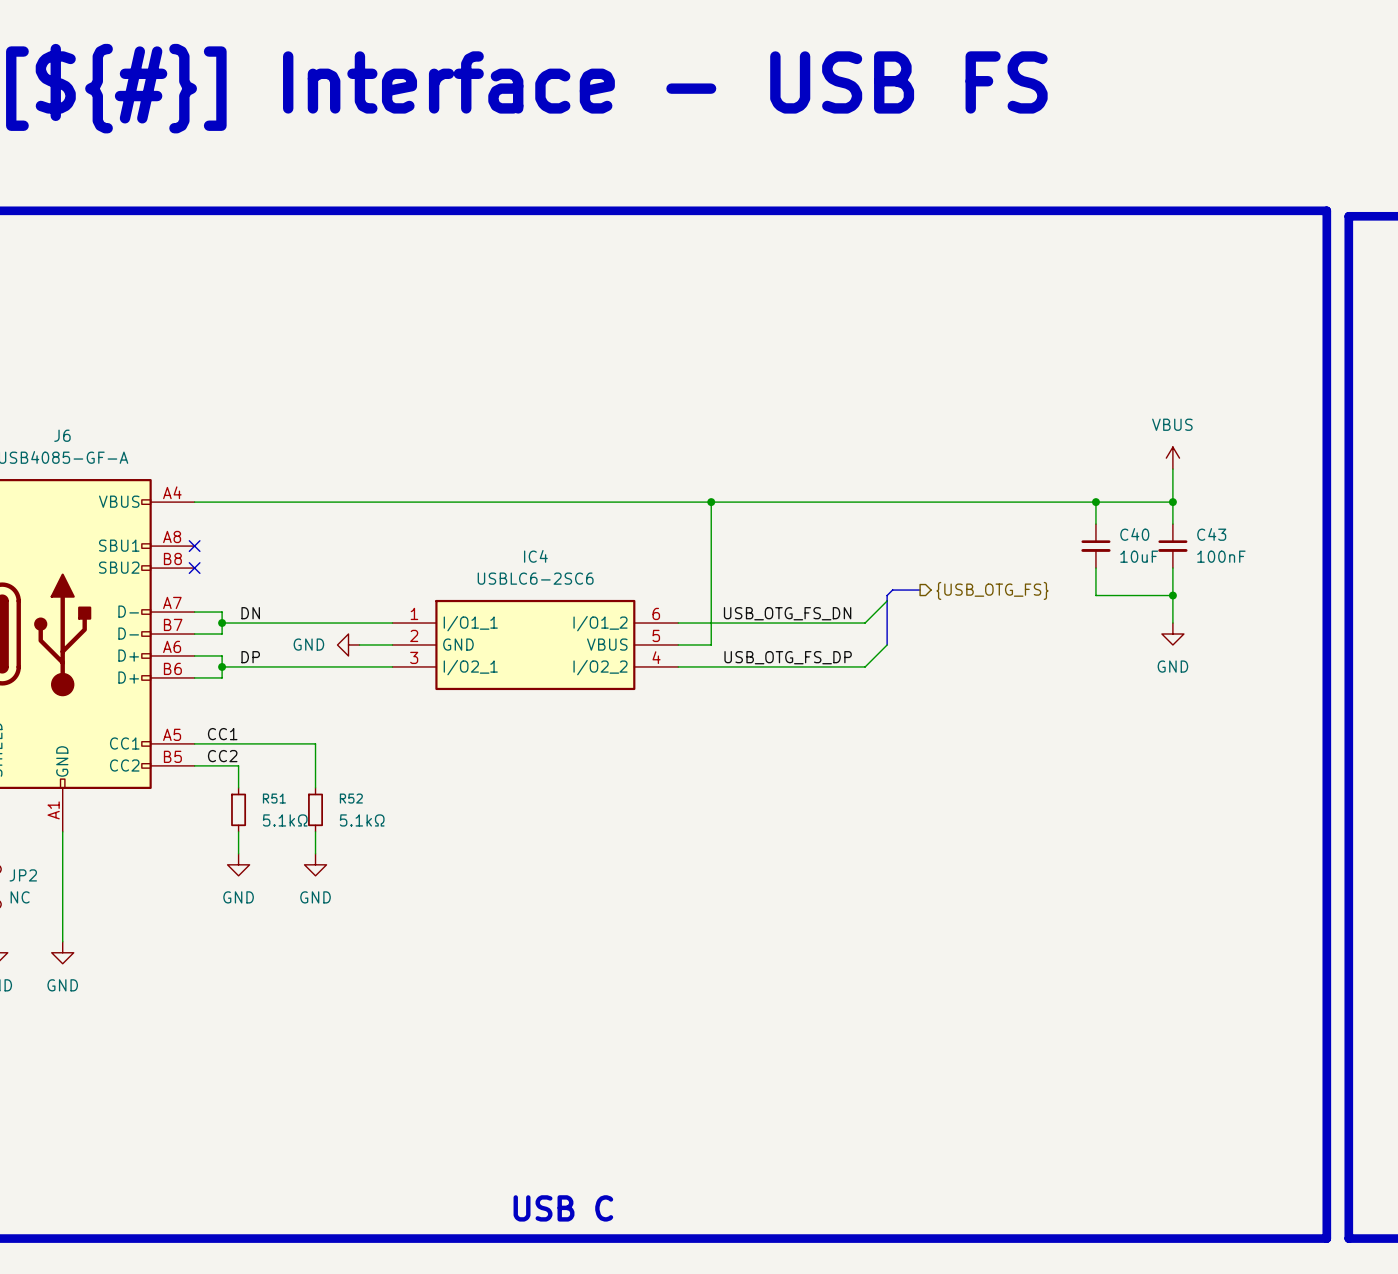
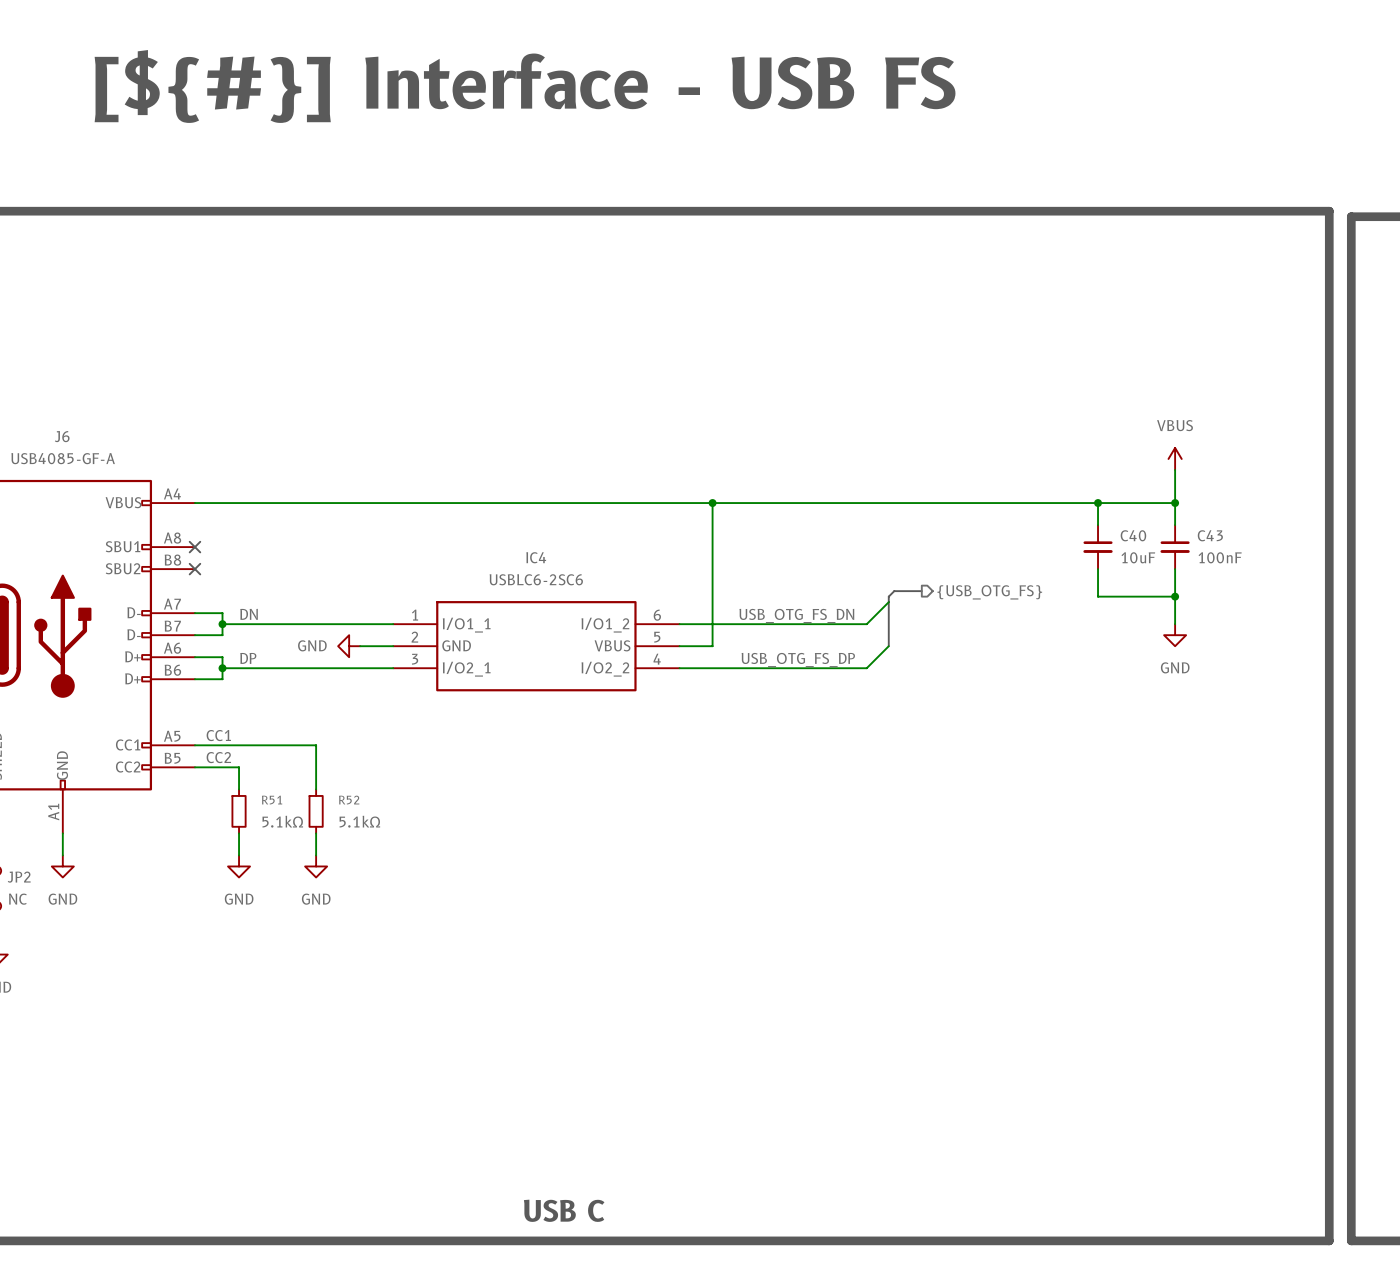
wire: (62, 853) (62, 941) -> none
power symbol position: GND (62, 952) -> GND (62, 866)

